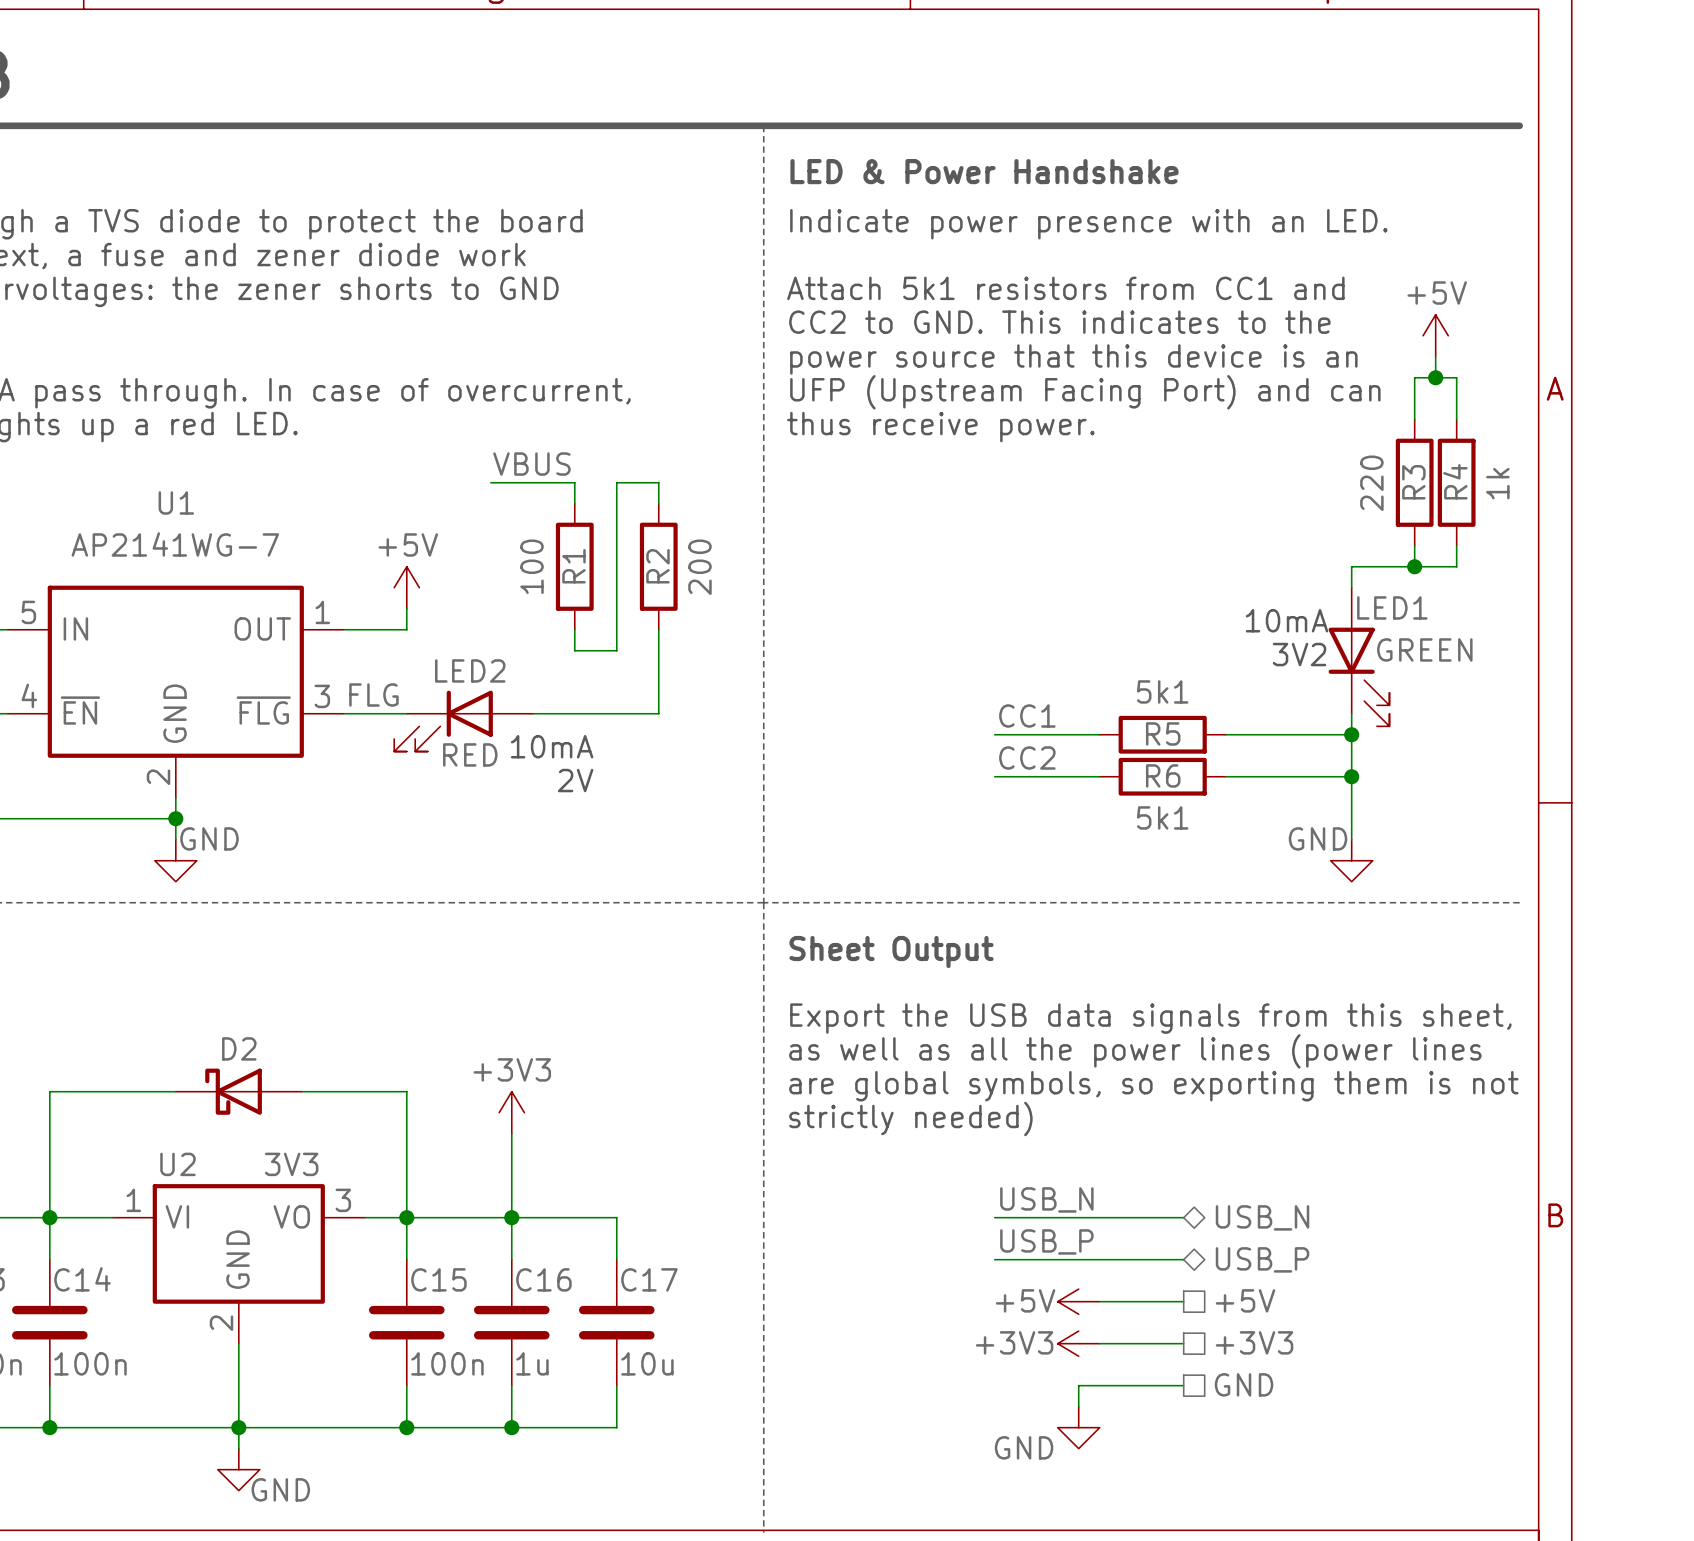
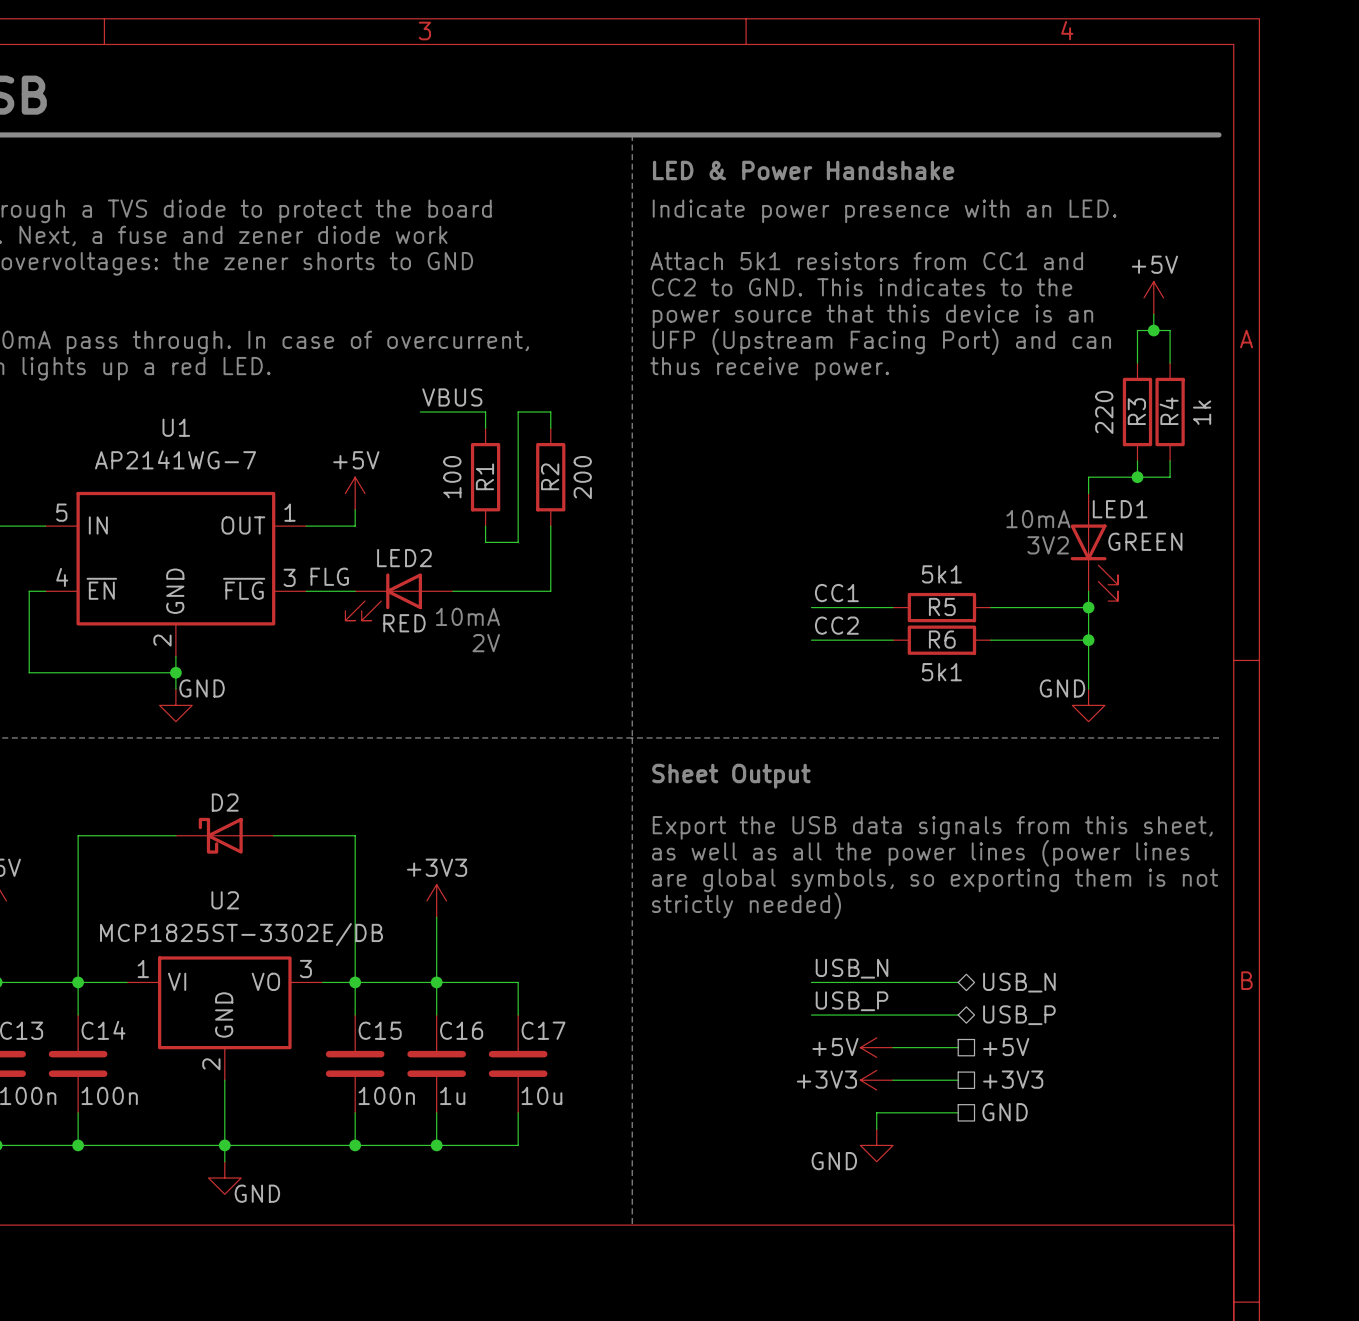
wire: (49, 1091) (175, 1091) -> (78, 884) (78, 835) (175, 835)
D2 position: (238, 1091) -> (224, 835)
wire: (301, 1091) (406, 1091) -> (273, 835) (355, 835) (355, 884)
U2 text: none -> MCP1825ST-3302E/DB (241, 934)
U2 name position: U2 (177, 1164) -> U2 (225, 900)
U2 value: 3V3 (291, 1164) -> none

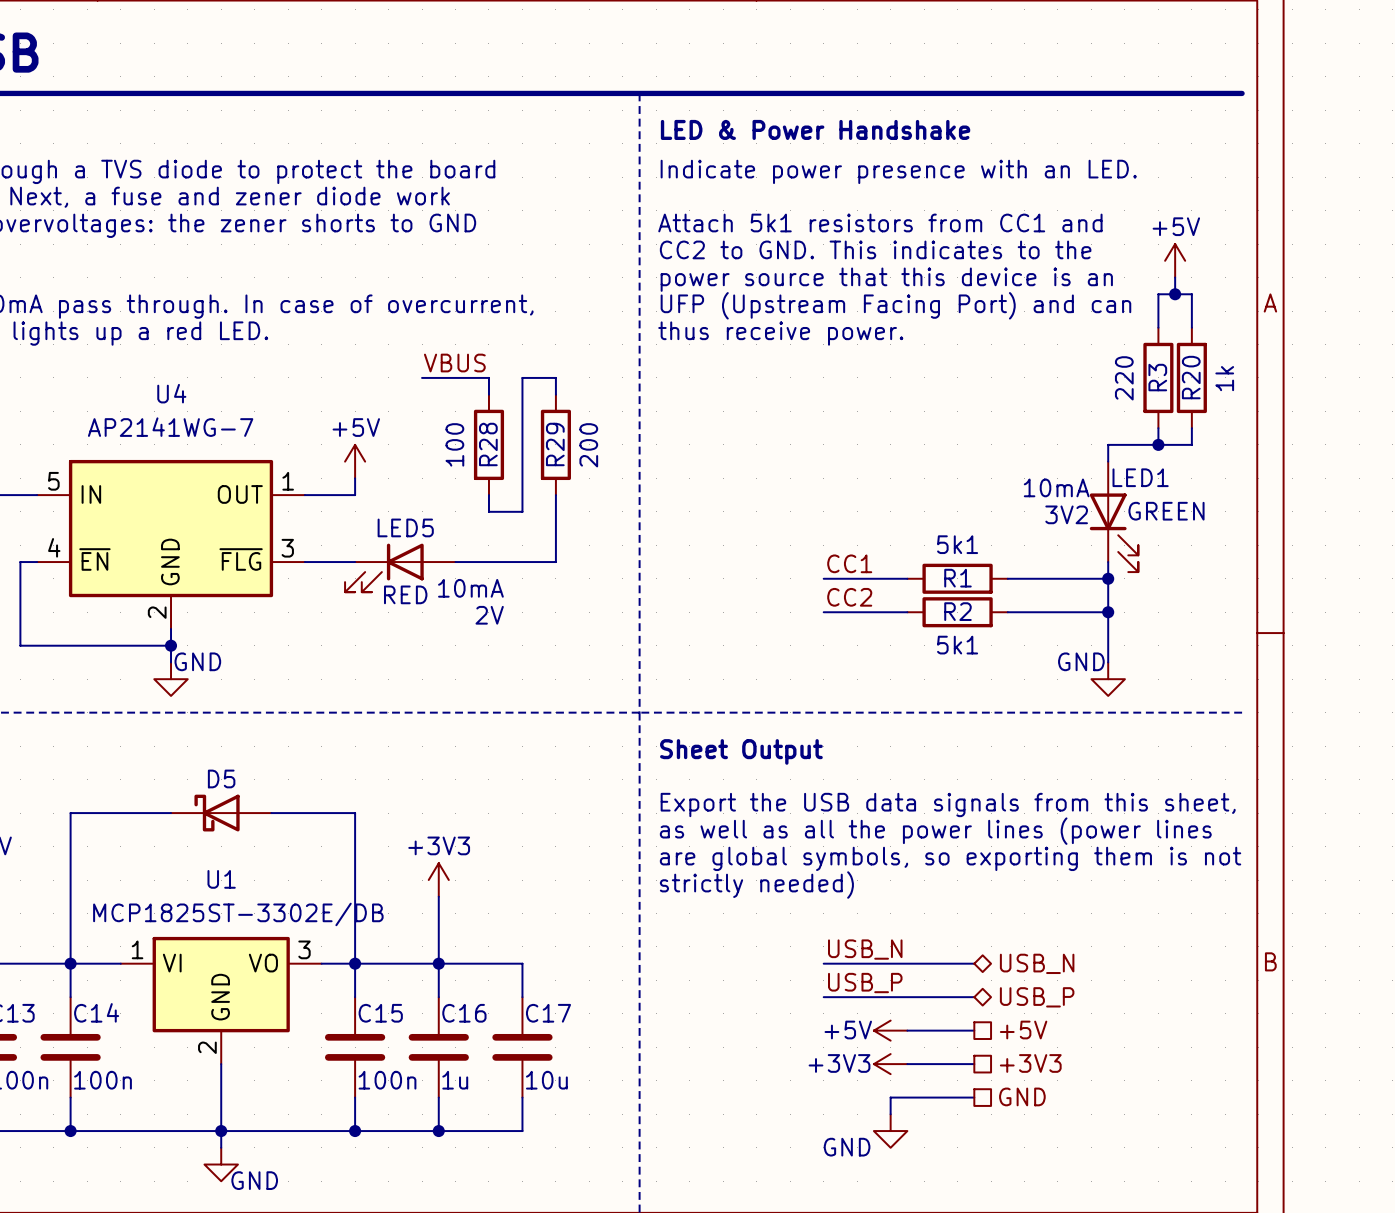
R4 name: R4 (1169, 411) -> R20 (1191, 377)
U1 name: U1 (176, 427) -> U4 (171, 393)
R1 name: R1 (484, 476) -> R28 (488, 444)
R2 name: R2 (550, 476) -> R29 (555, 444)
LED2 name: LED2 (404, 558) -> LED5 (405, 527)
label: FLG (329, 576) -> none
R5 name: R5 (942, 606) -> R1 (957, 578)
R6 name: R6 (942, 639) -> R2 (957, 611)
D2 name: D2 (225, 802) -> D5 (221, 778)
U2 name: U2 (225, 900) -> U1 (221, 879)

